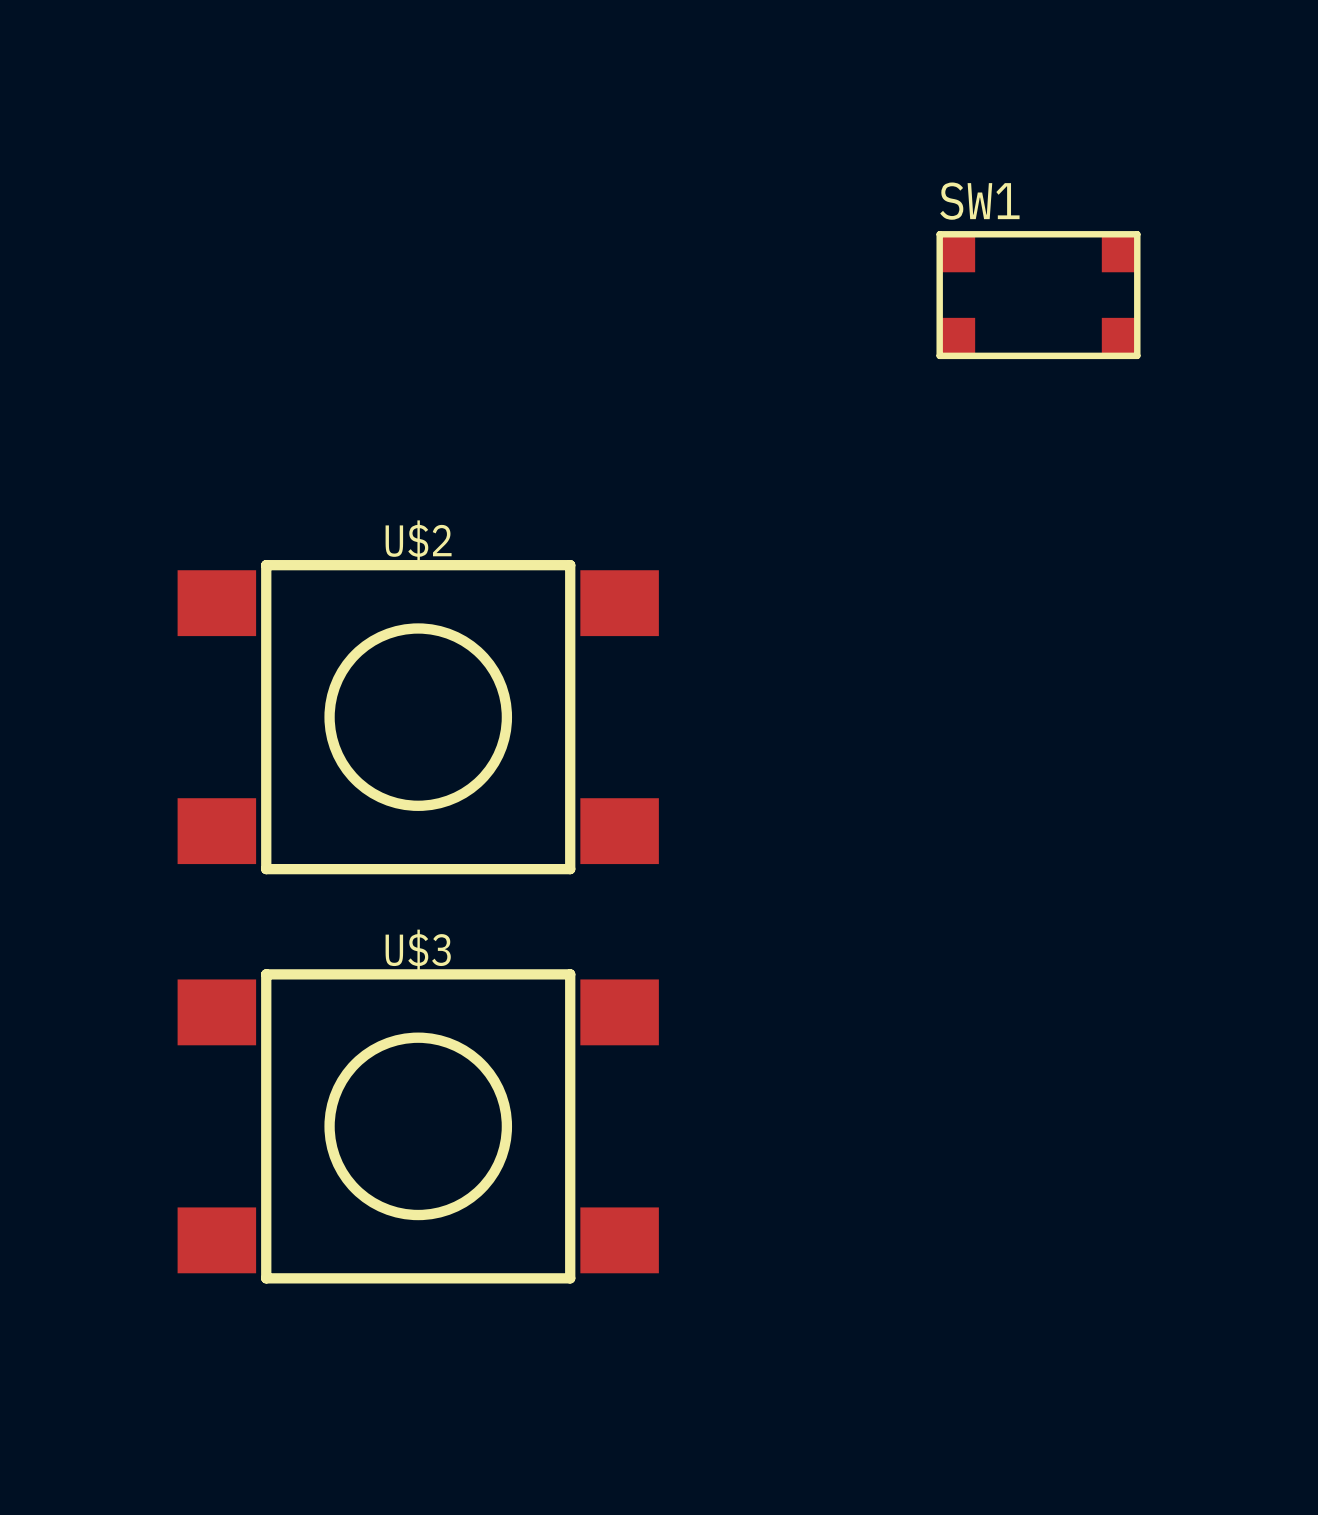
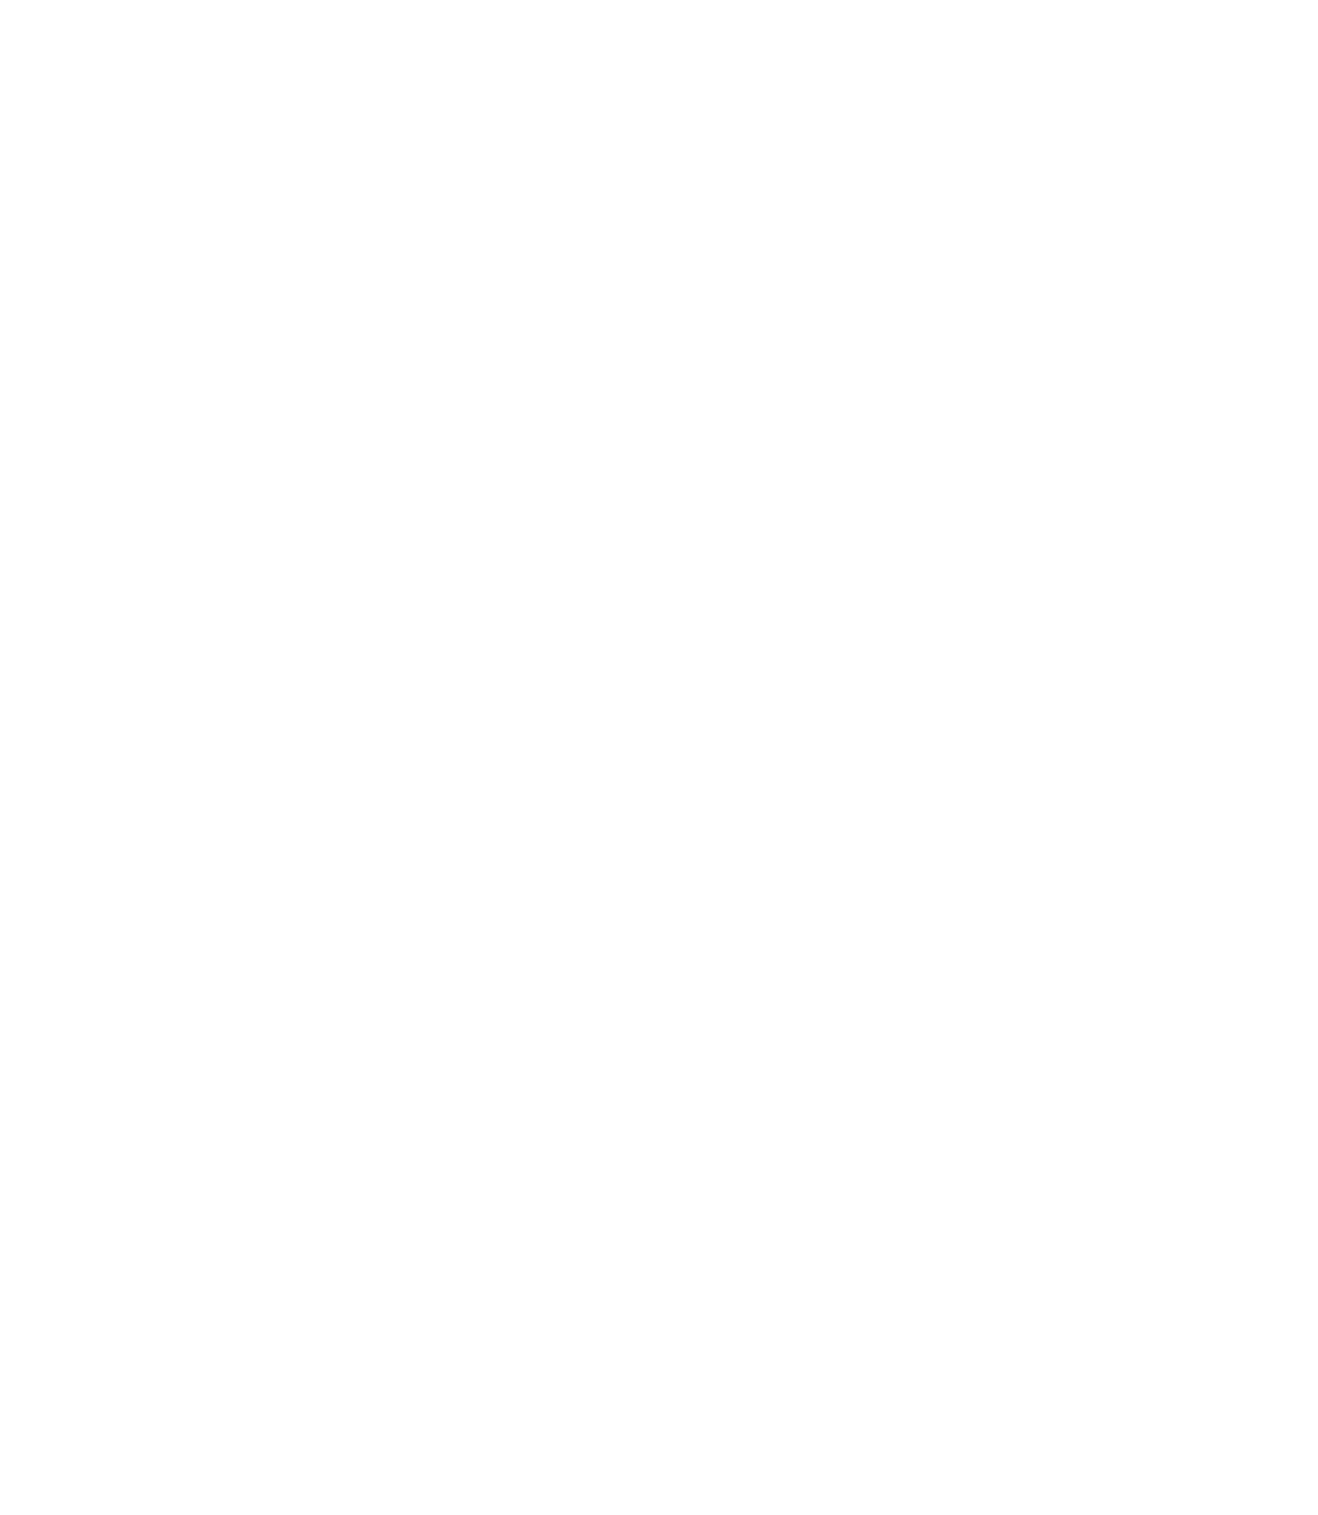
SW1: (1038, 295) -> none
U$2: (418, 717) -> none
U$3: (418, 1126) -> none

